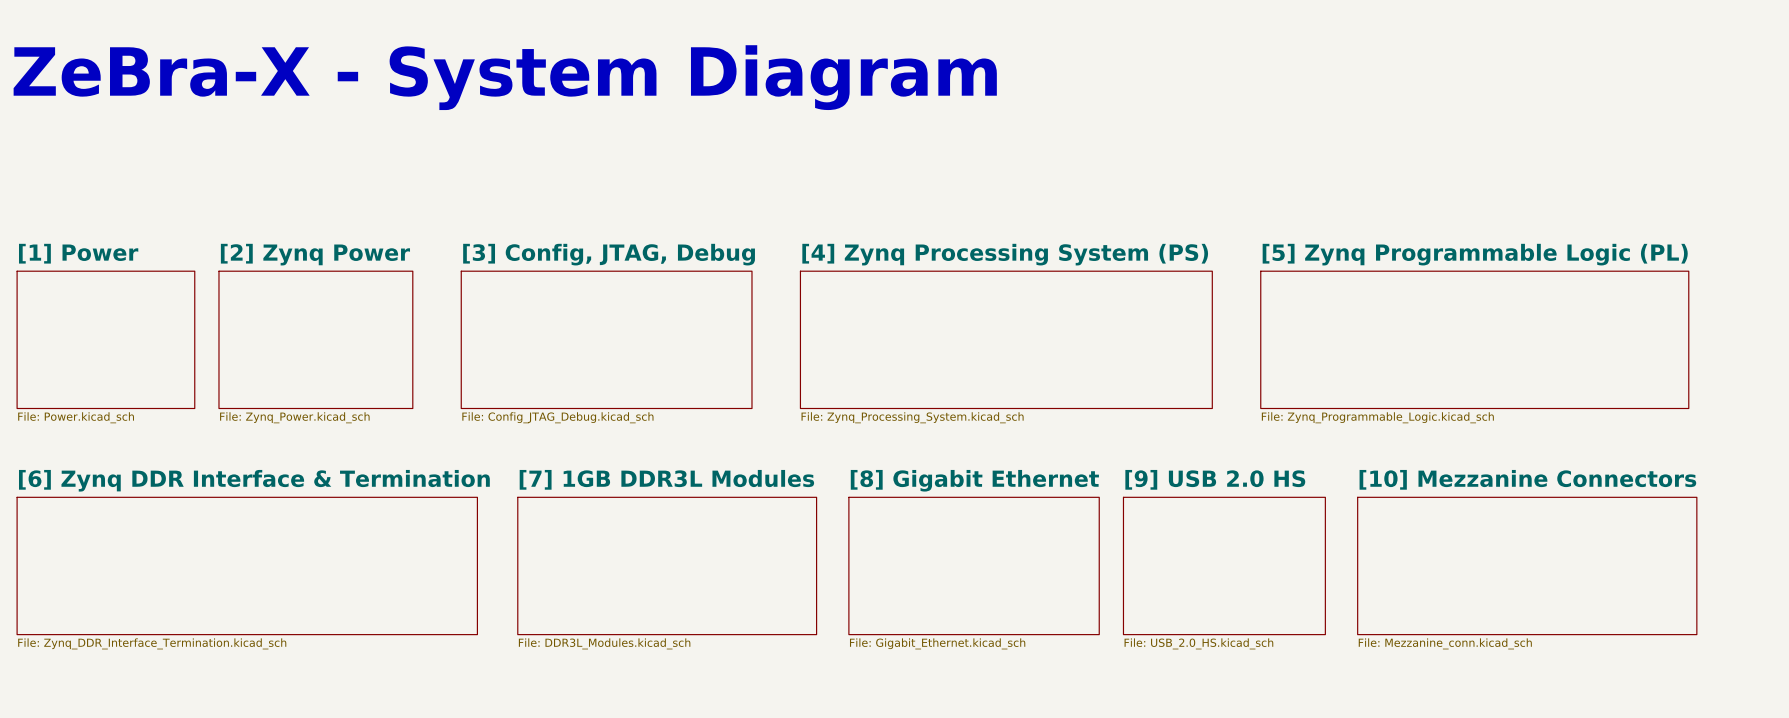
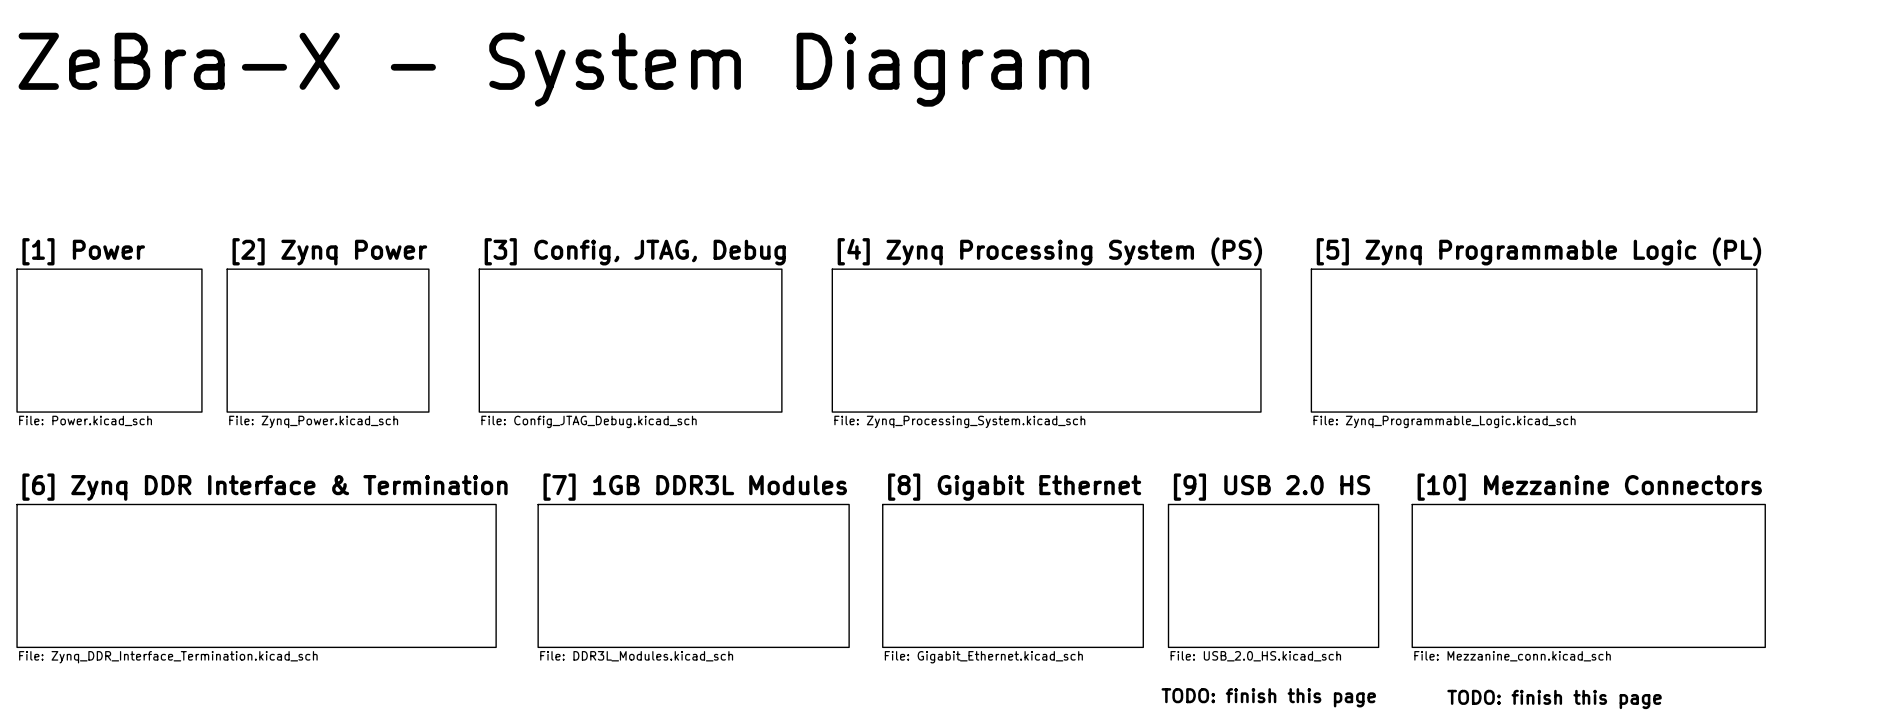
text: none -> TODO: finish this page (1268, 697)
text: none -> TODO: finish this page (1554, 699)

